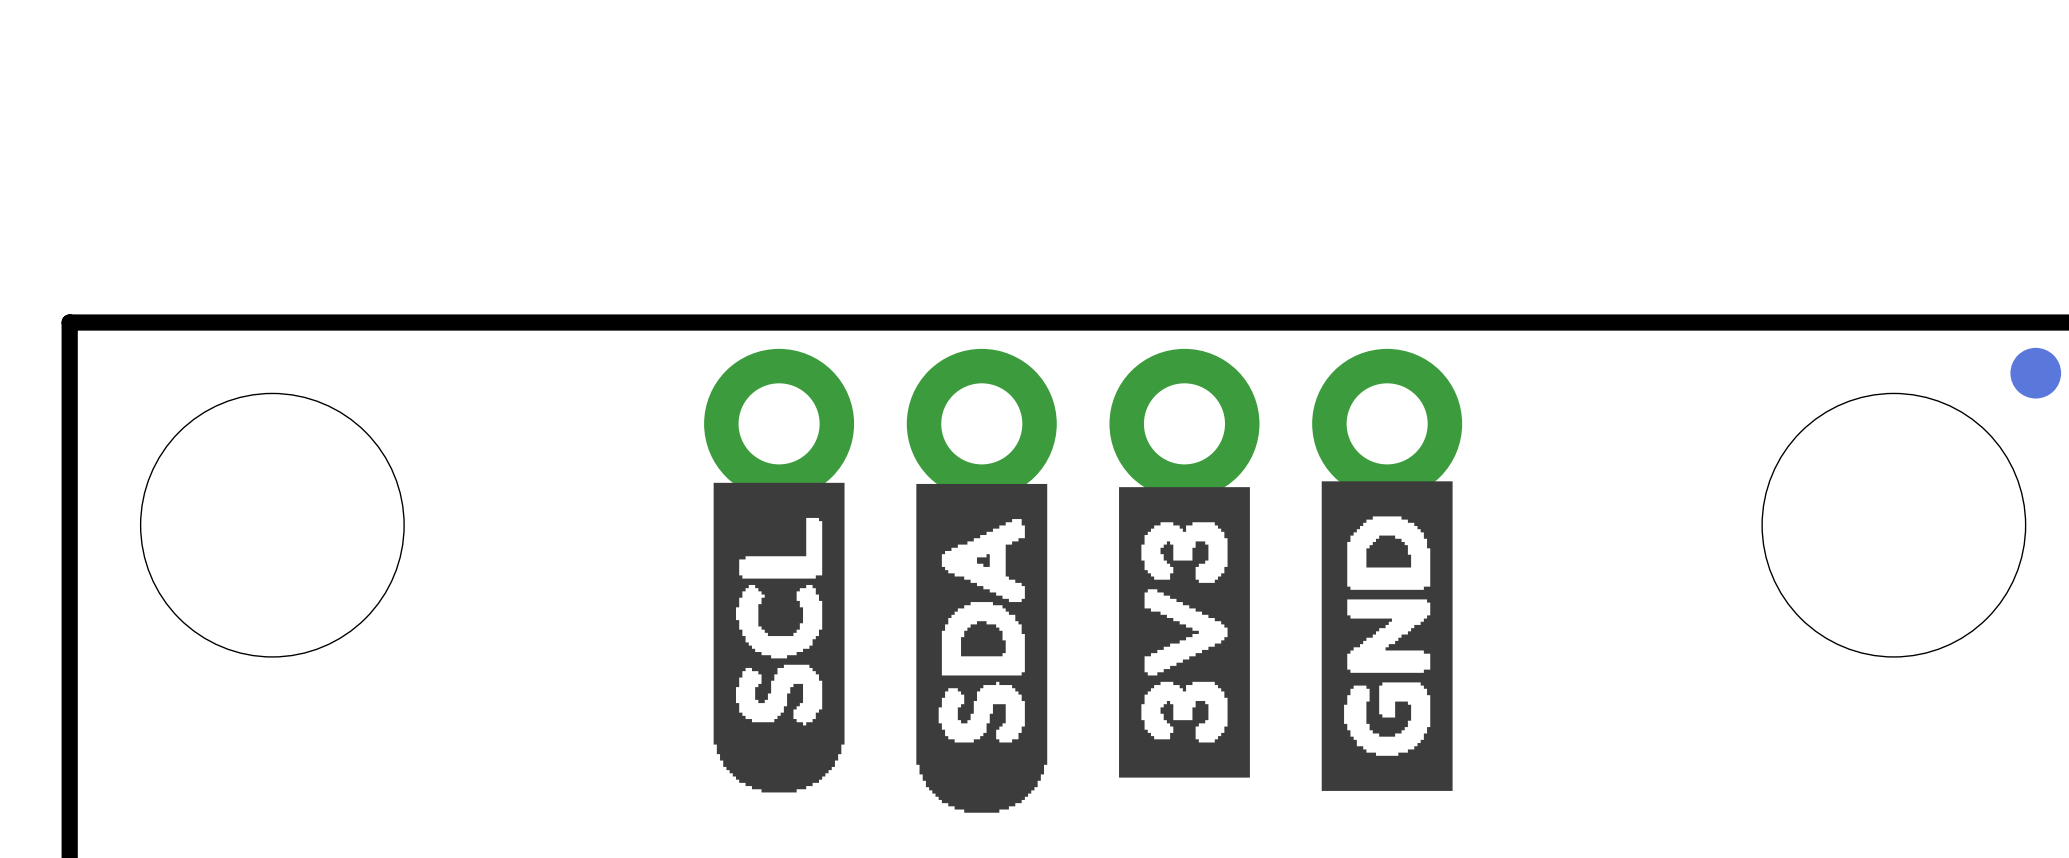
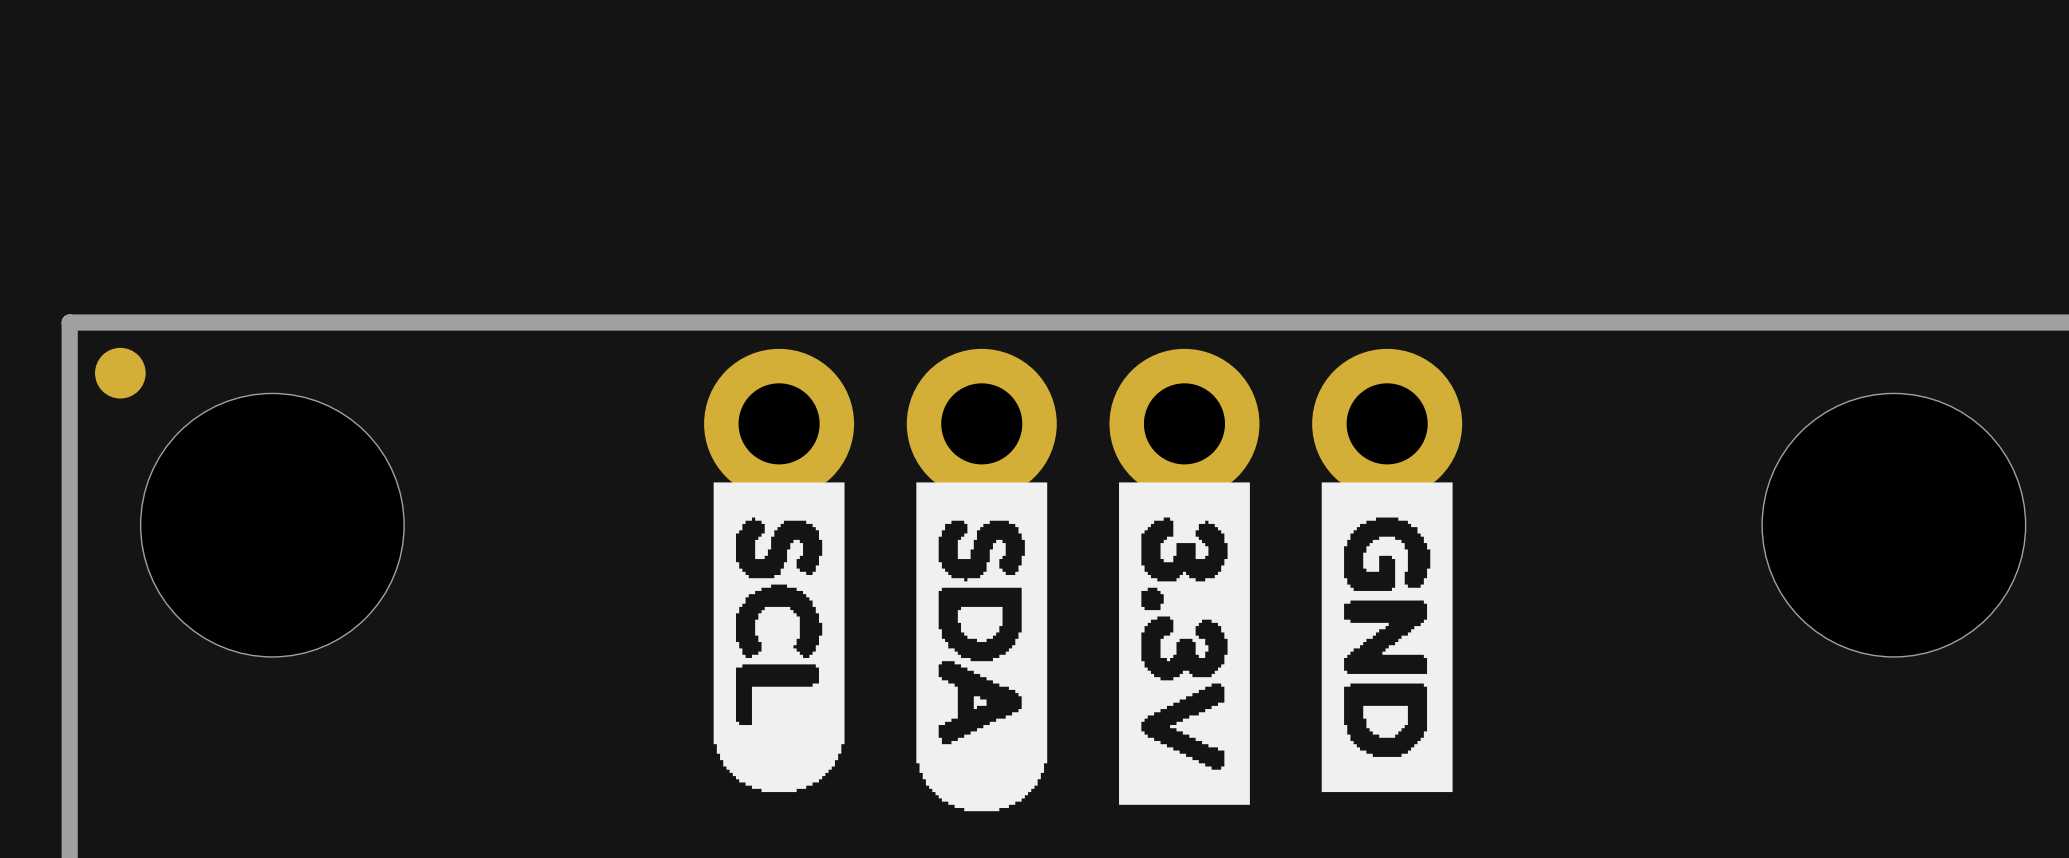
part position: (2035, 373) -> (120, 373)
drawing shape: [1321, 481, 1453, 791] -> [1321, 482, 1453, 793]
drawing shape: [713, 482, 845, 793] -> [713, 482, 845, 793]
drawing shape: [916, 483, 1048, 813] -> [916, 482, 1048, 812]
drawing shape: [1119, 487, 1250, 778] -> [1119, 482, 1250, 805]

